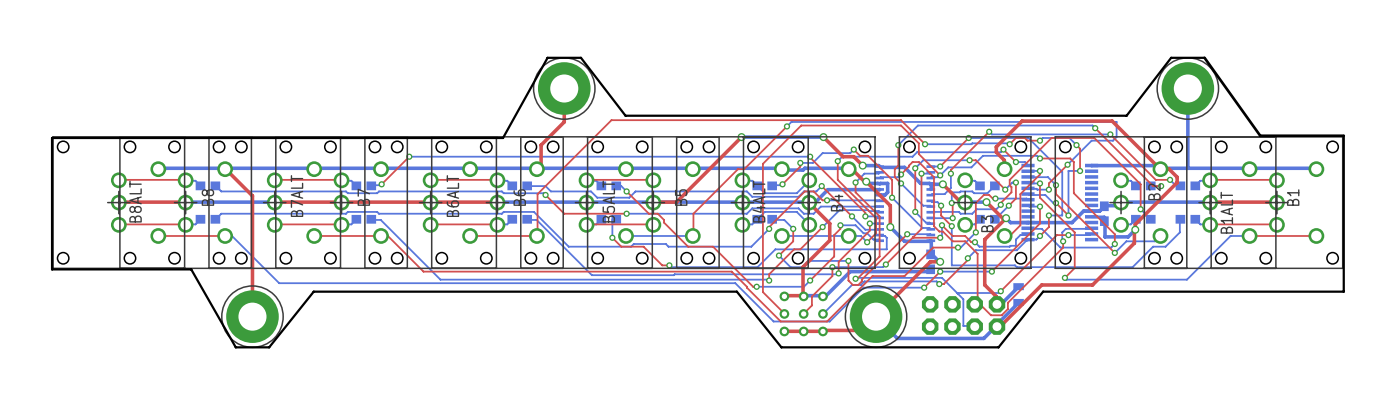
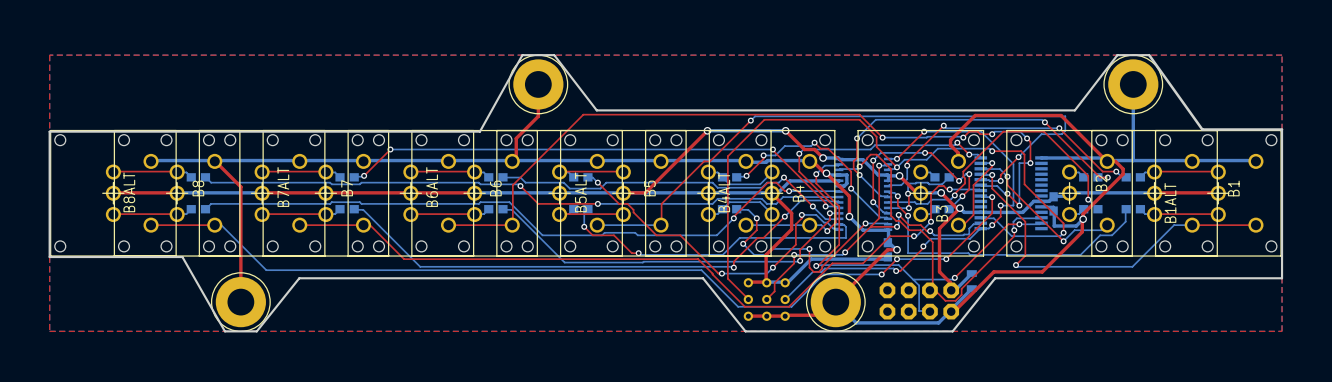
top zone outline: none -> (49, 55) (1282, 55) (1282, 331) (49, 331) (49, 55)

